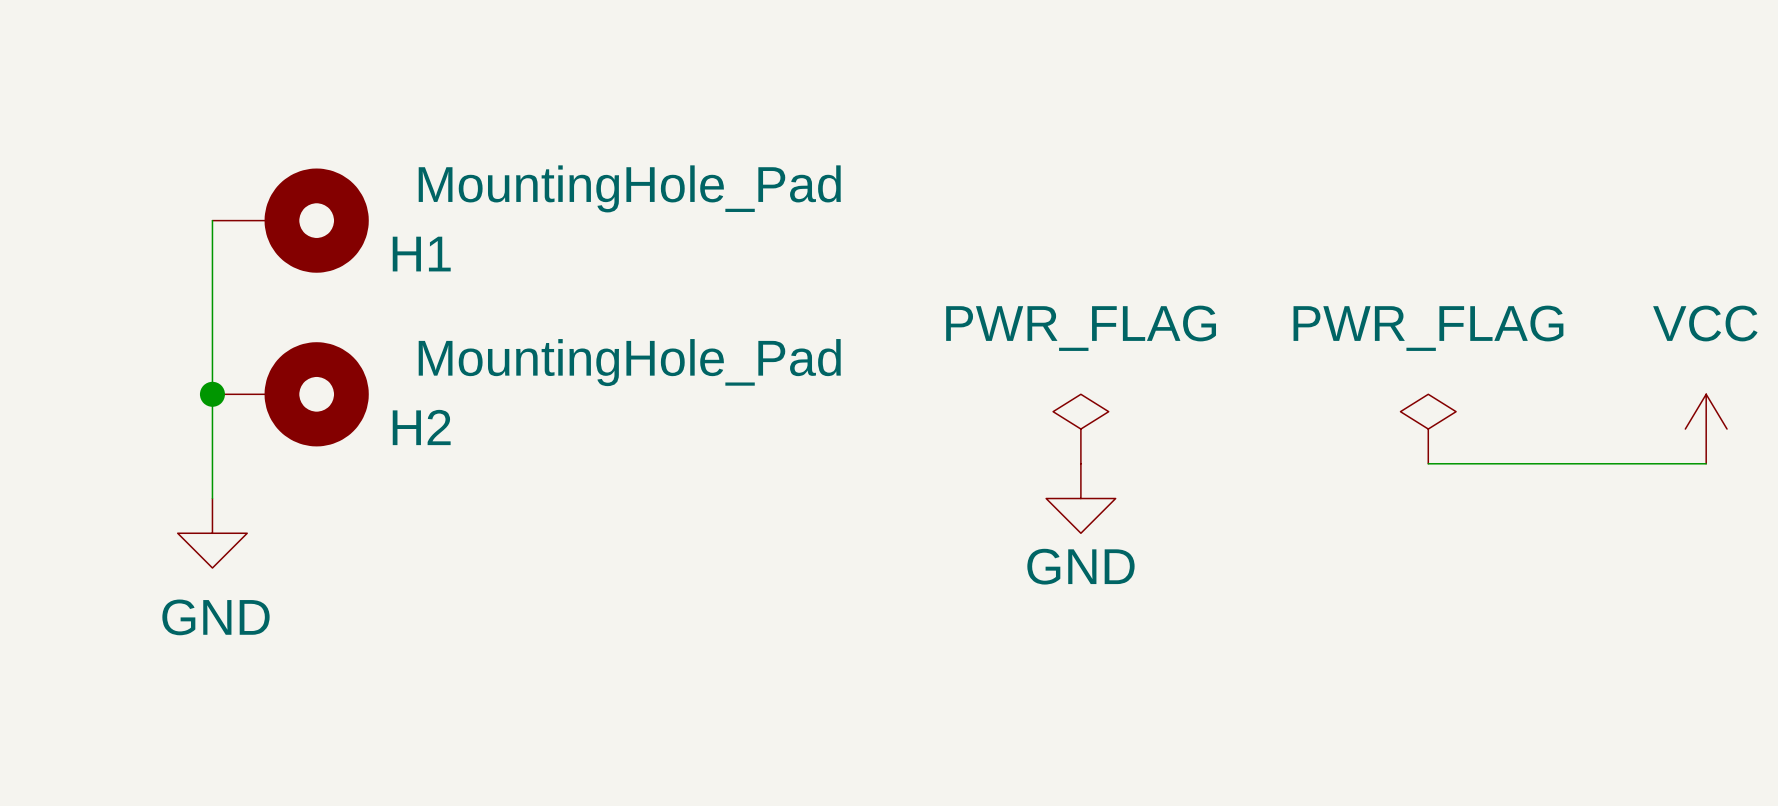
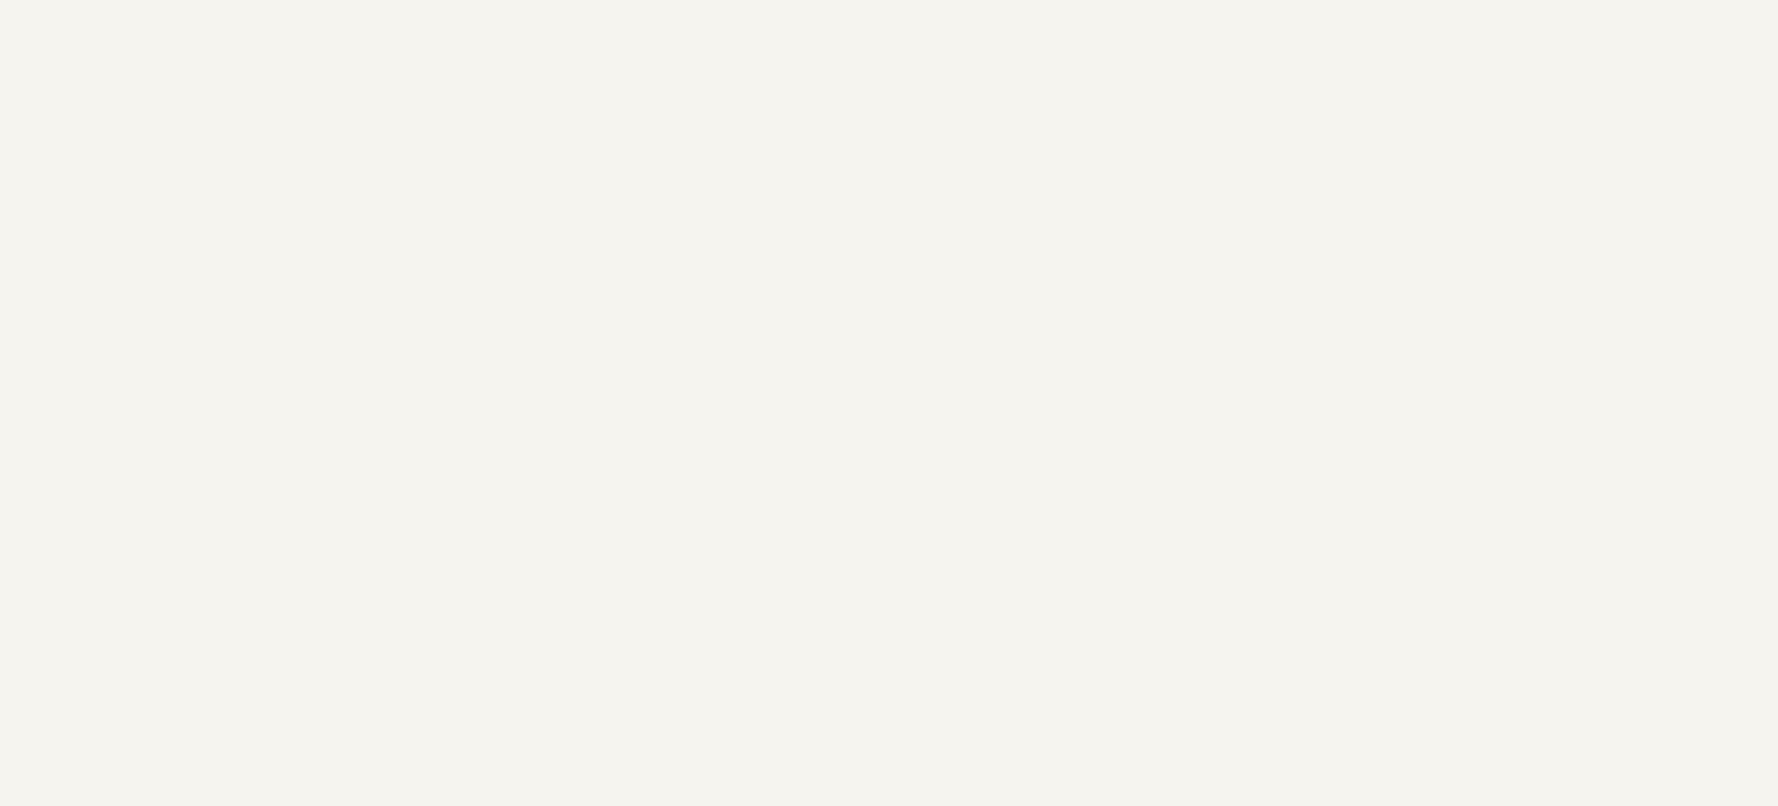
wire: (212, 220) (212, 498) -> none
H1: MountingHole_Pad (290, 220) -> none
junction: (212, 394) -> none
H2: MountingHole_Pad (290, 394) -> none
power symbol: PWR_FLAG (1080, 429) -> none
power symbol: PWR_FLAG (1428, 429) -> none
power symbol: VCC (1706, 429) -> none
wire: (1428, 463) (1706, 463) -> none
power symbol: GND (1080, 498) -> none
power symbol: GND (212, 533) -> none

